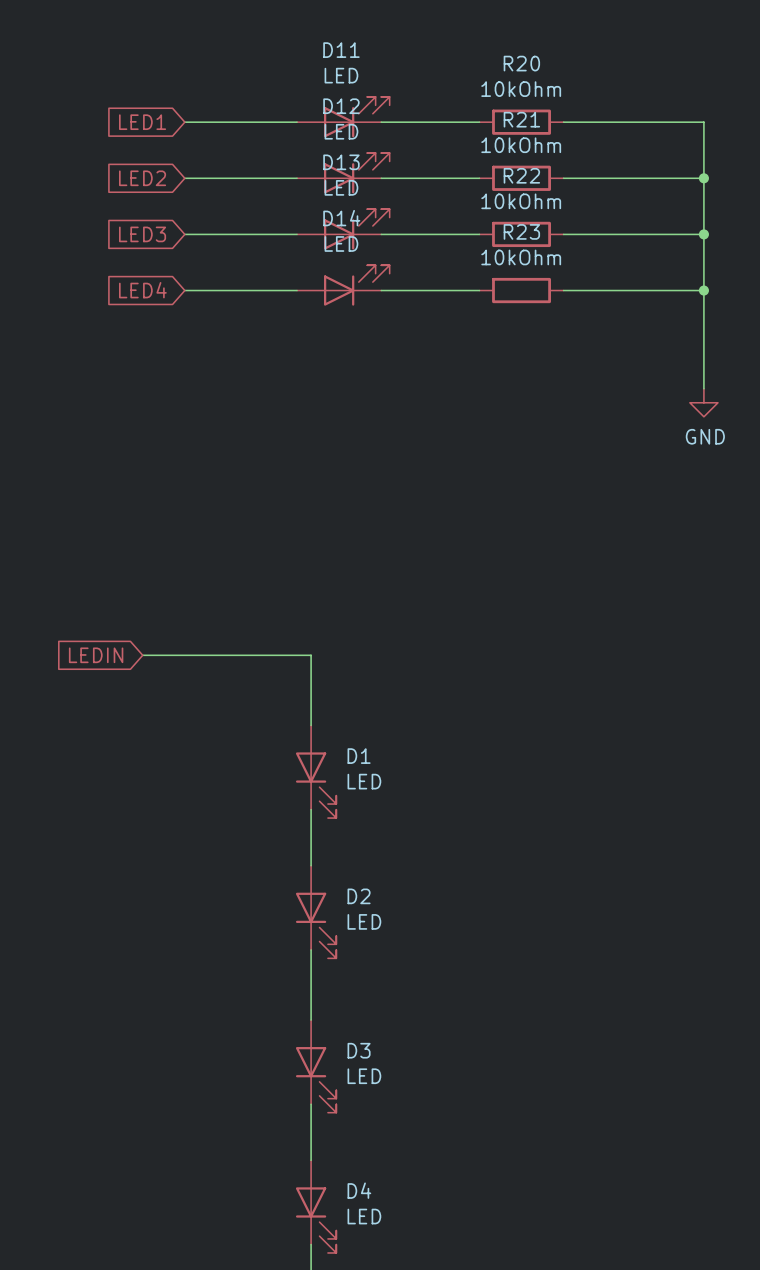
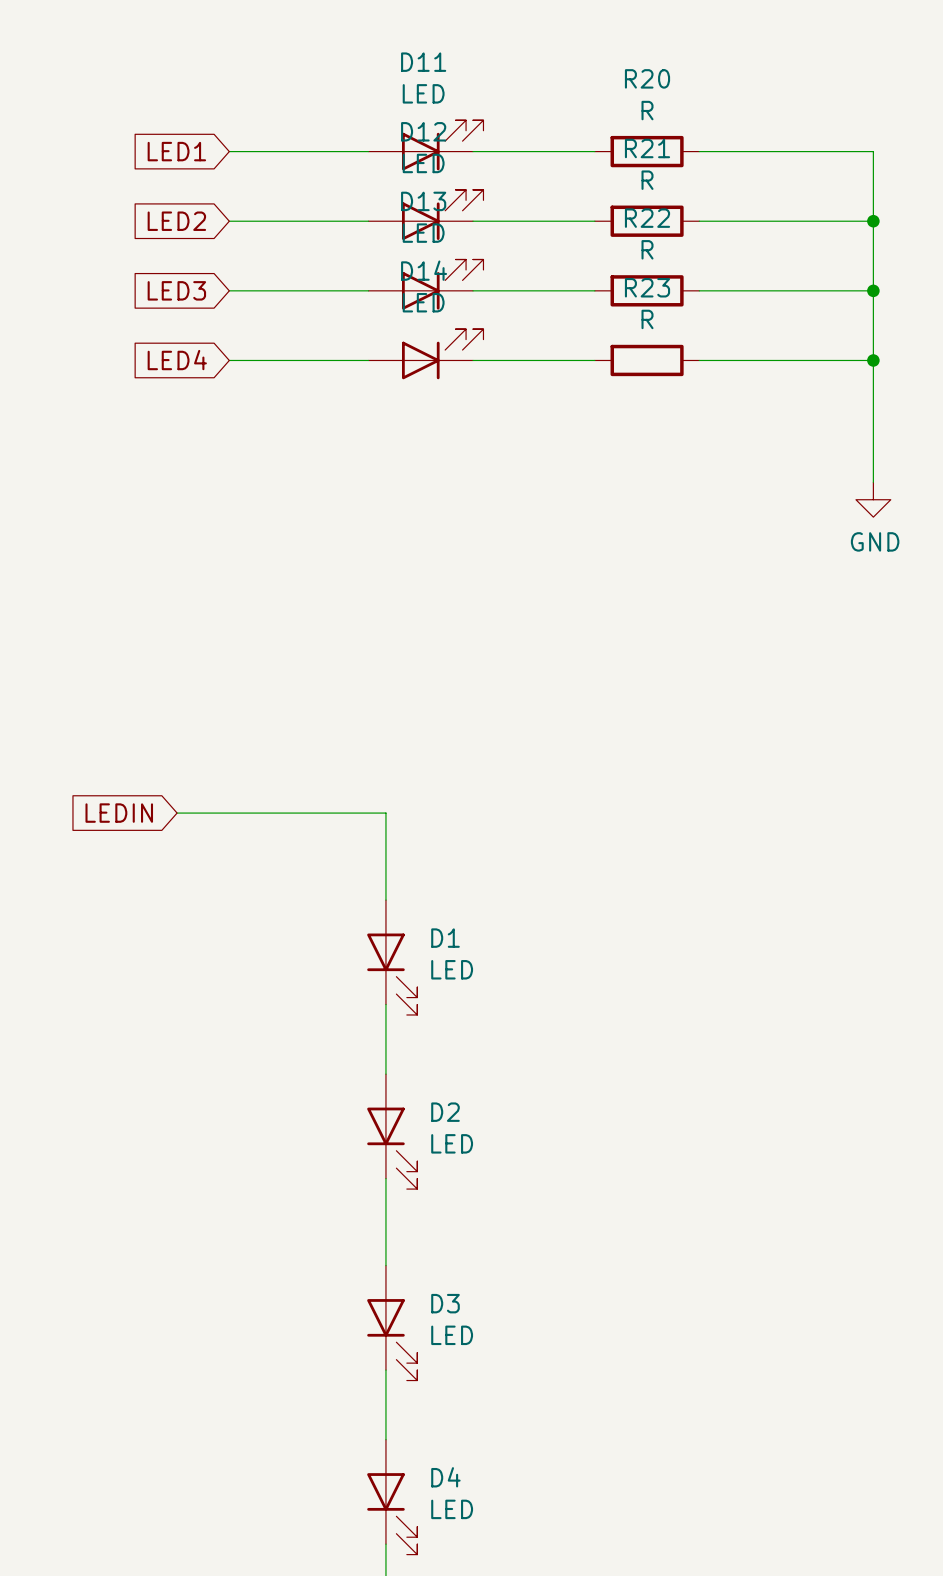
R20 value: 10kOhm (521, 89) -> R (647, 110)
R21 value: 10kOhm (521, 145) -> R (647, 180)
R22 value: 10kOhm (521, 201) -> R (647, 249)
R23 value: 10kOhm (521, 257) -> R (647, 319)

